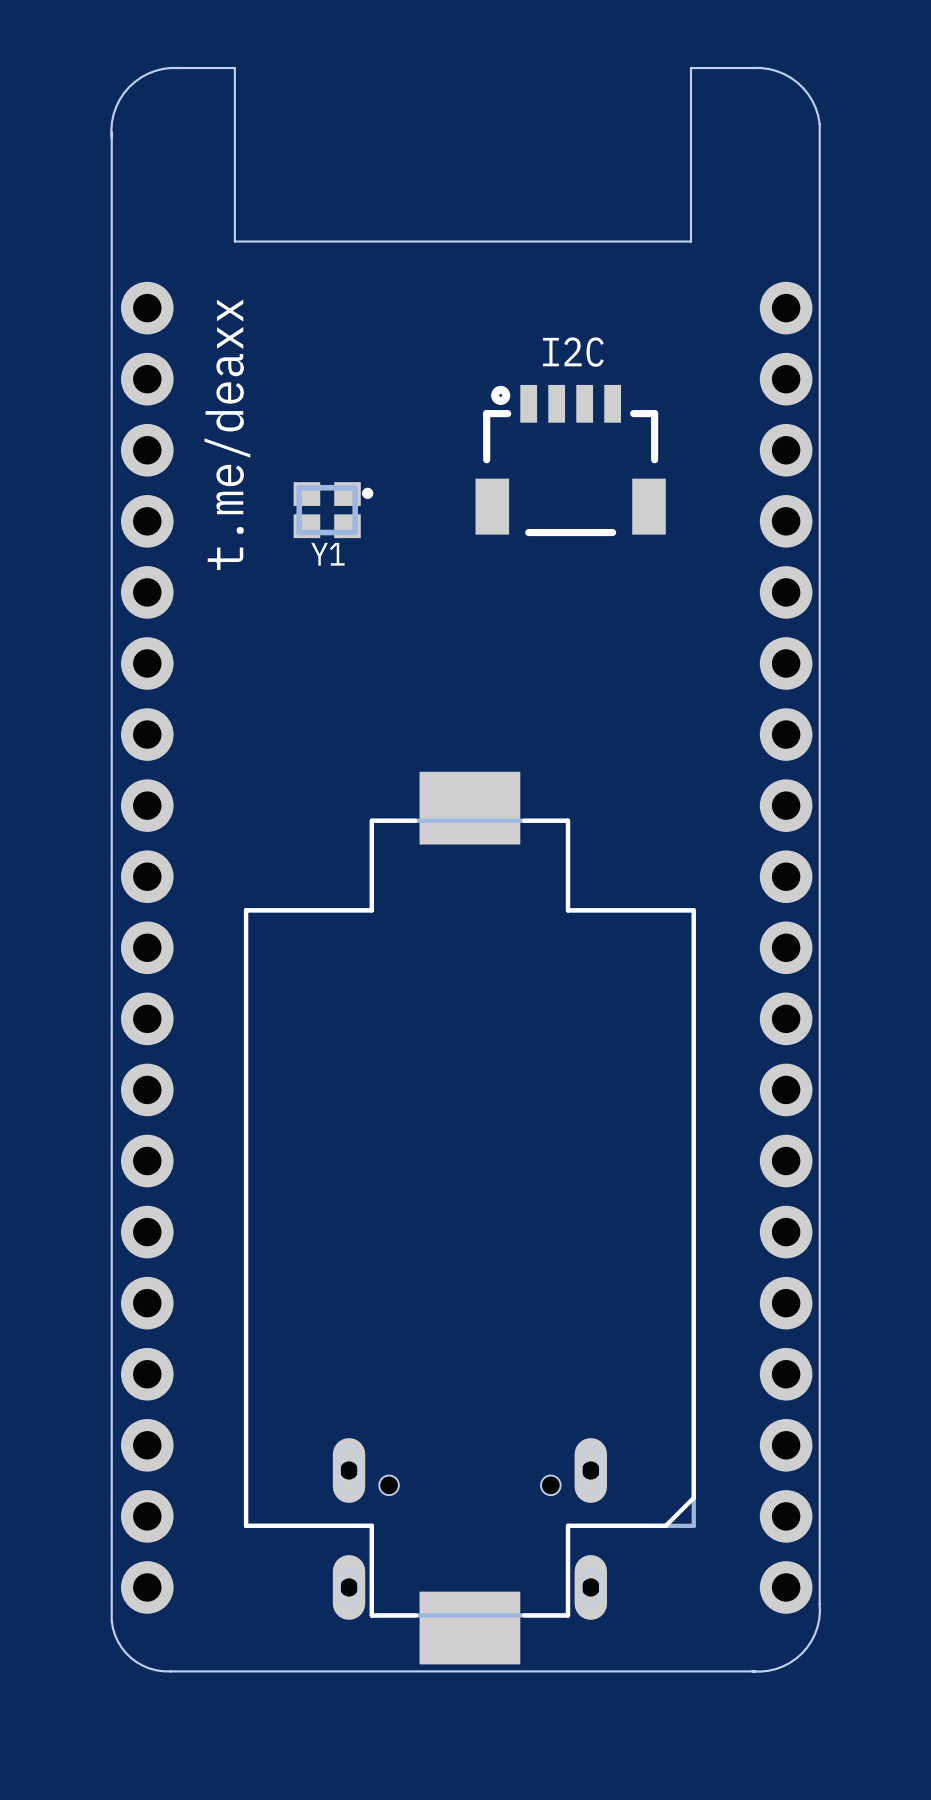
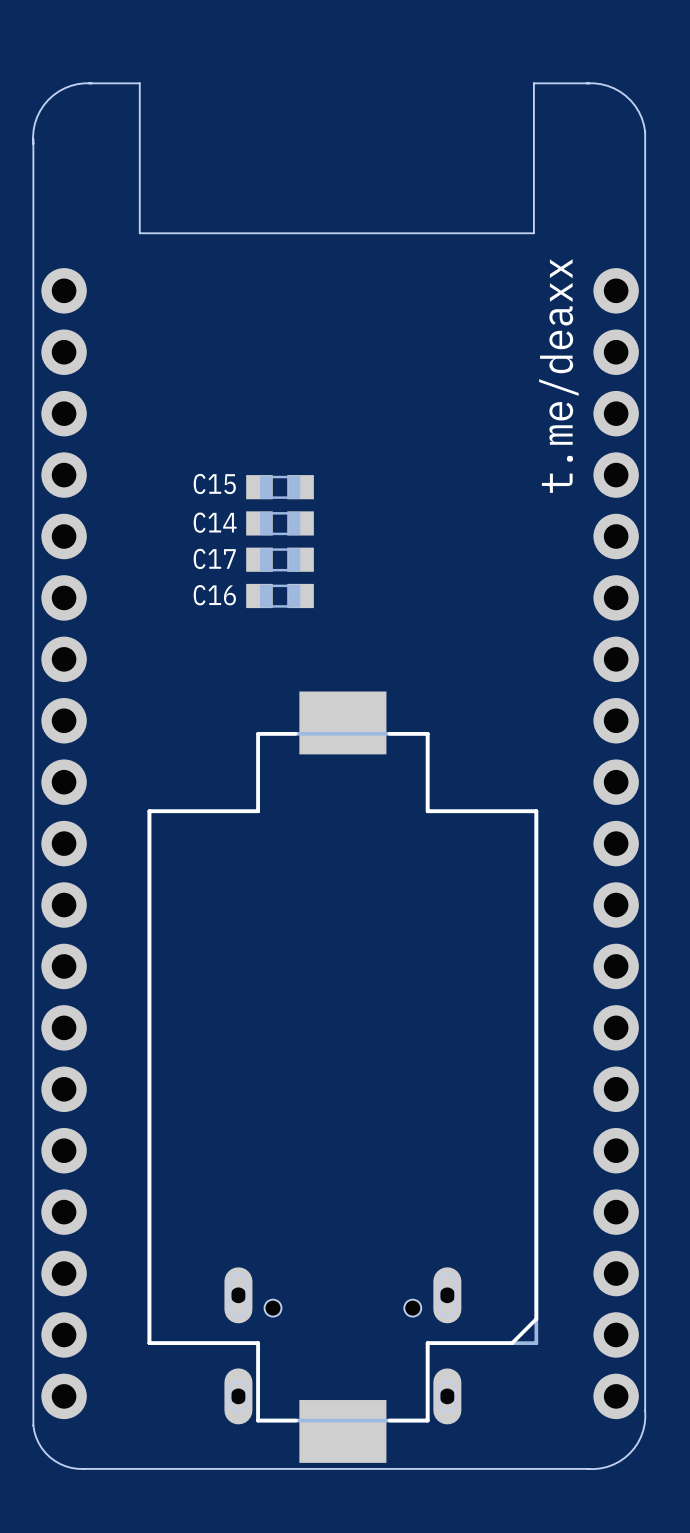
text position: t.me/deaxx (227, 434) -> t.me/deaxx (558, 376)
I2C: (570, 460) -> none
Y1: (333, 510) -> none
C15: none -> (280, 487)
C14: none -> (280, 523)
C17: none -> (280, 559)
C16: none -> (280, 595)

